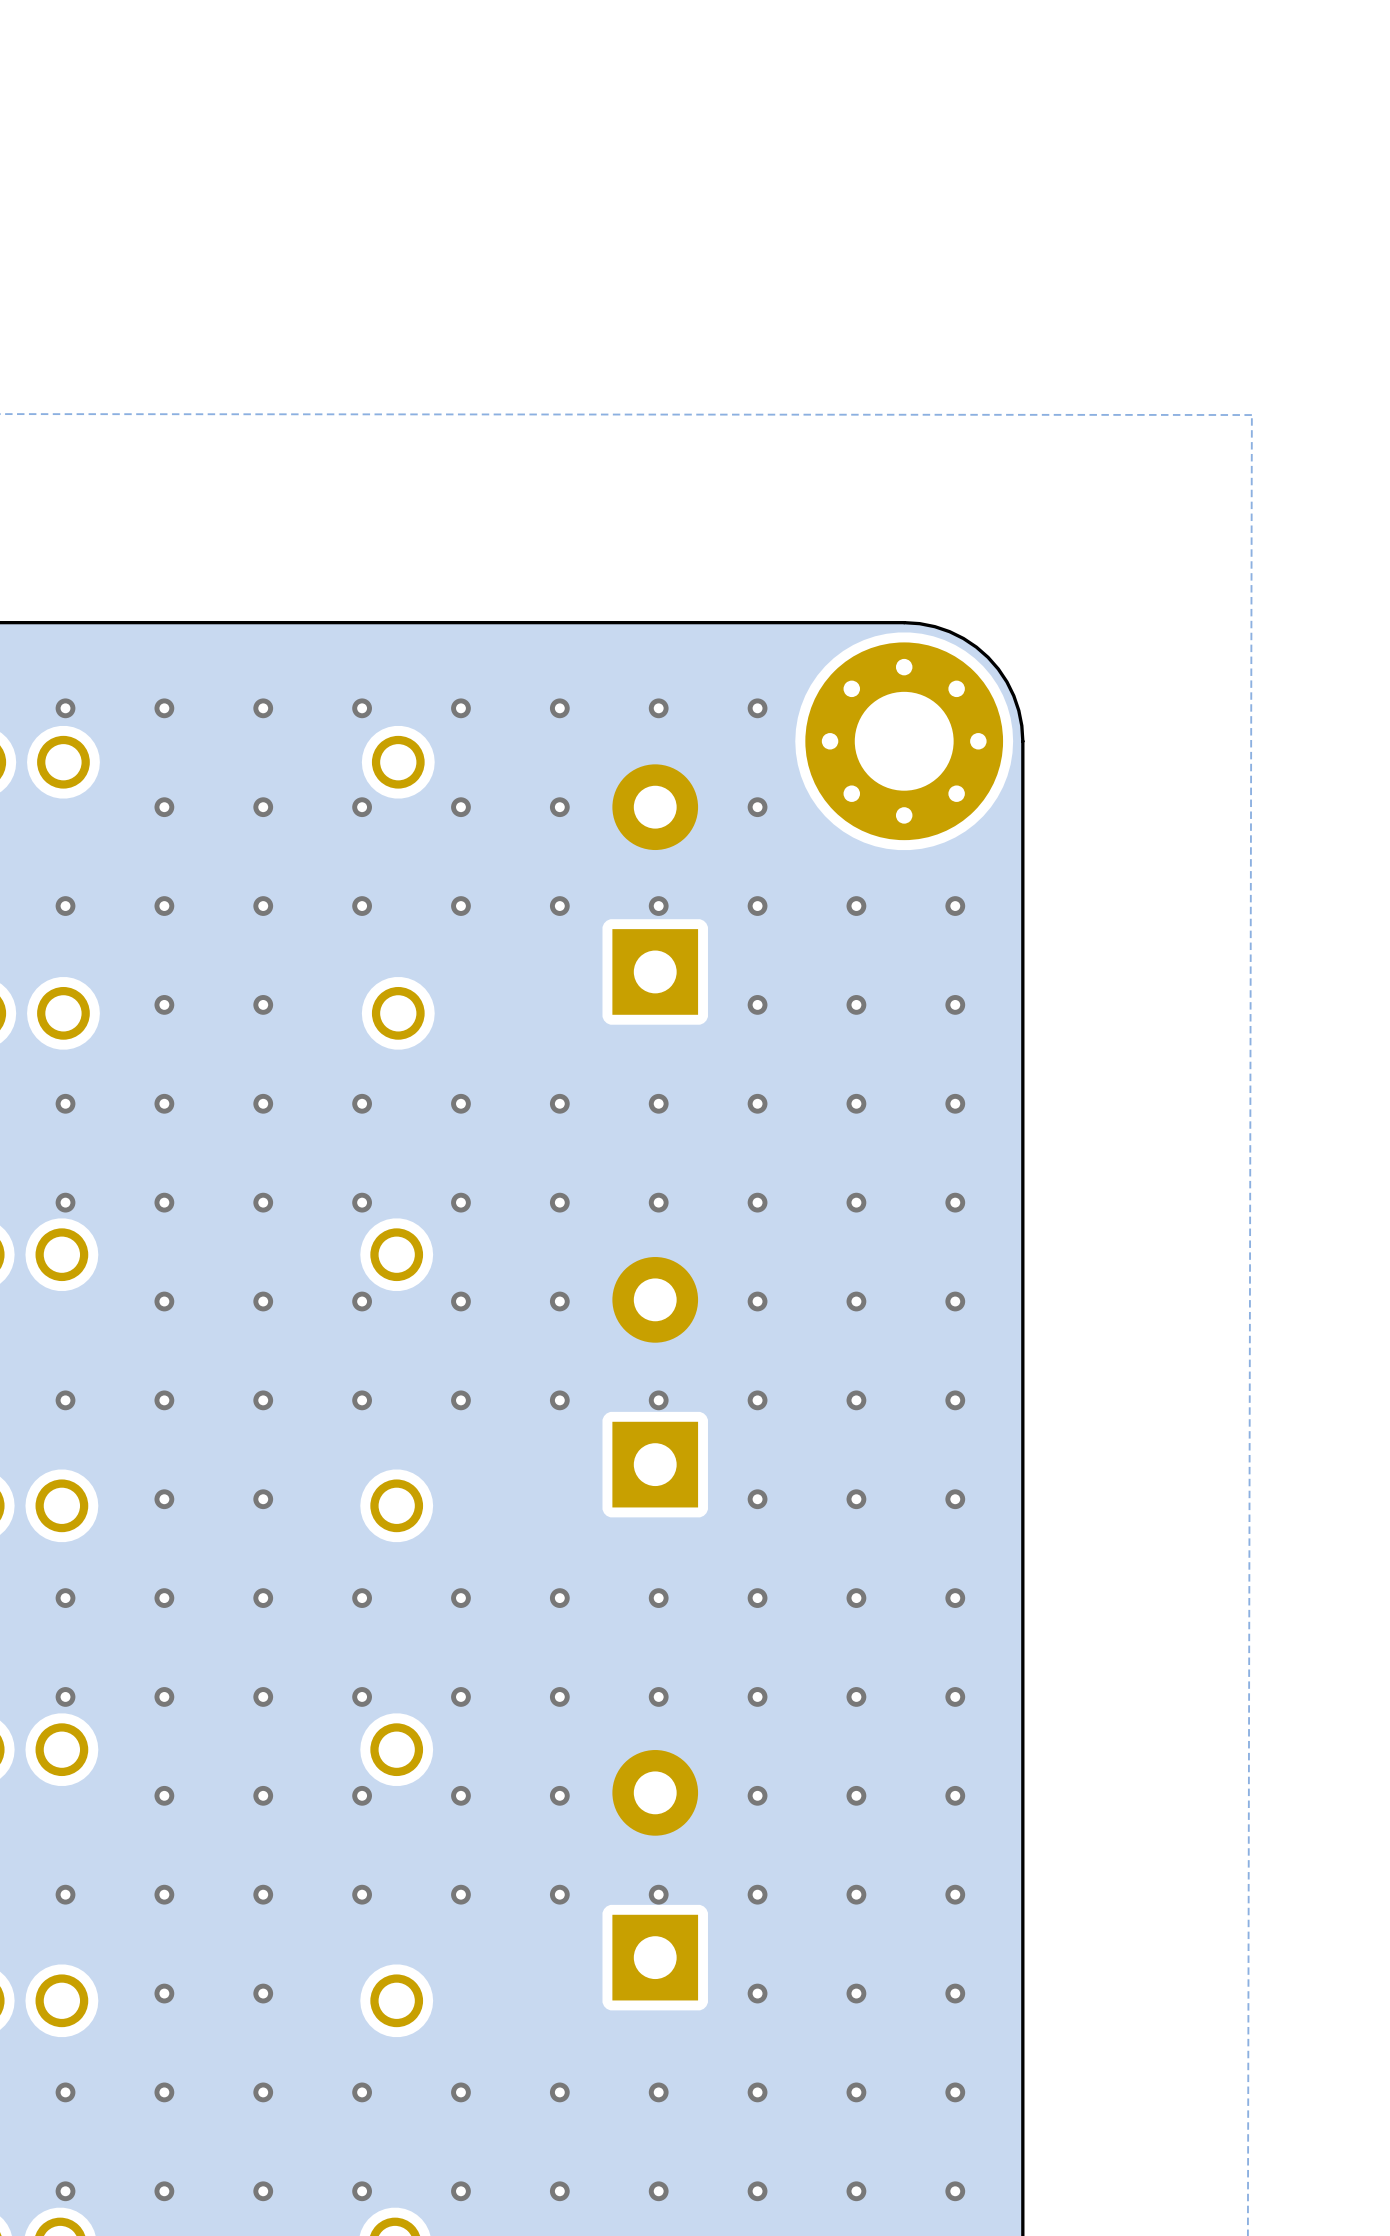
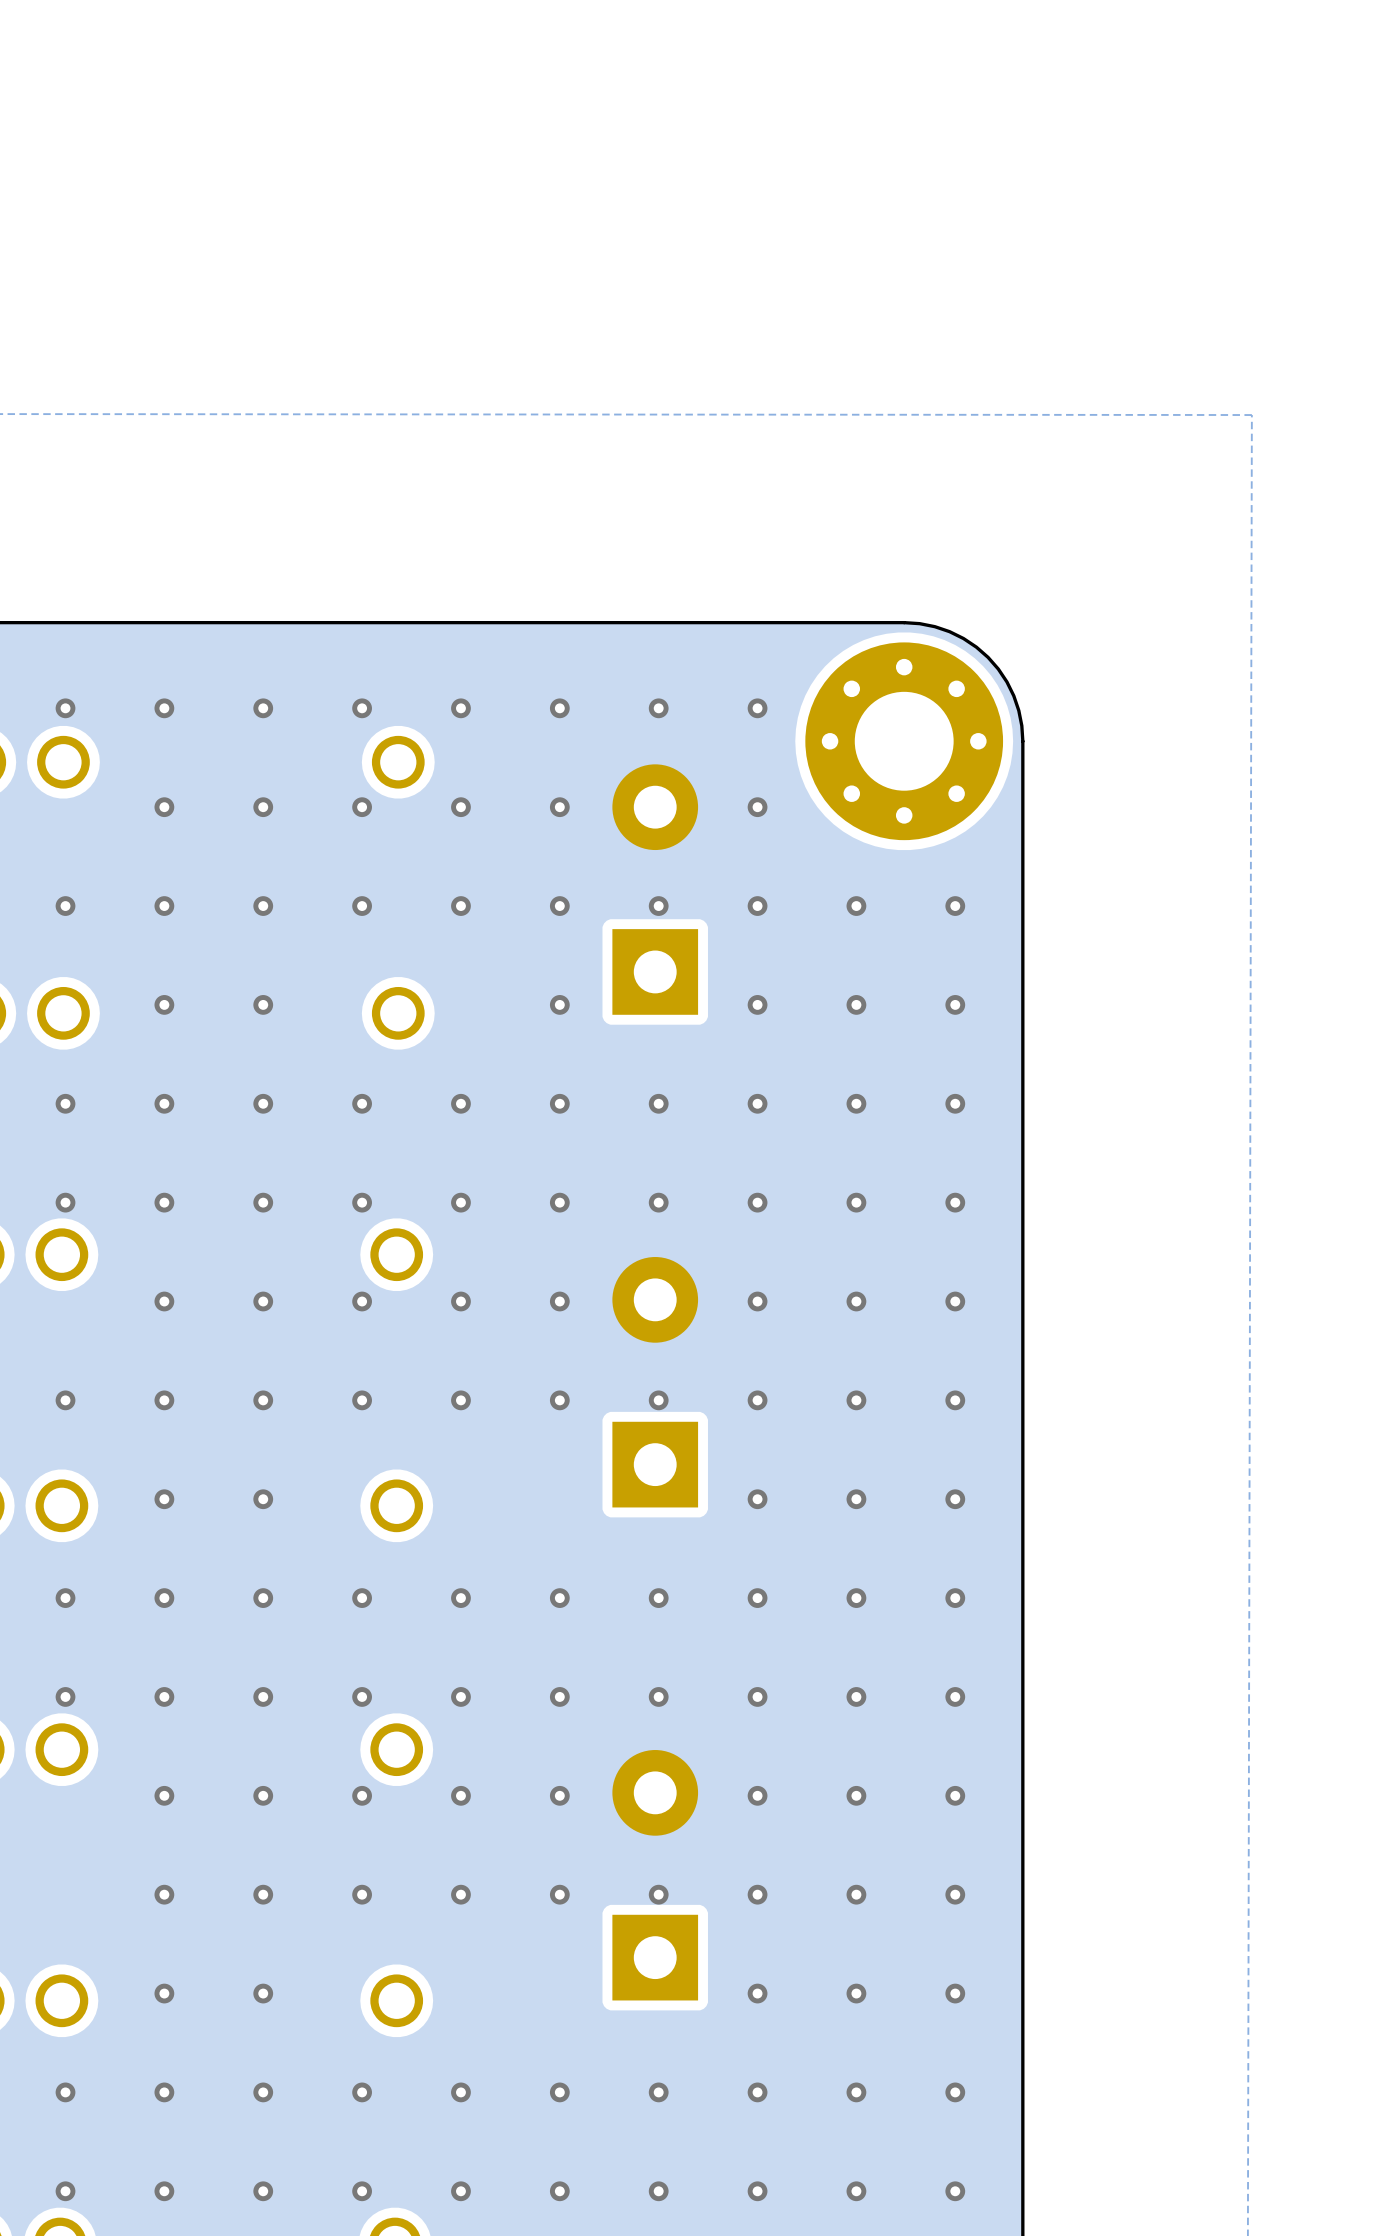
via: none -> (559, 1004)
via: (65, 1894) -> none

